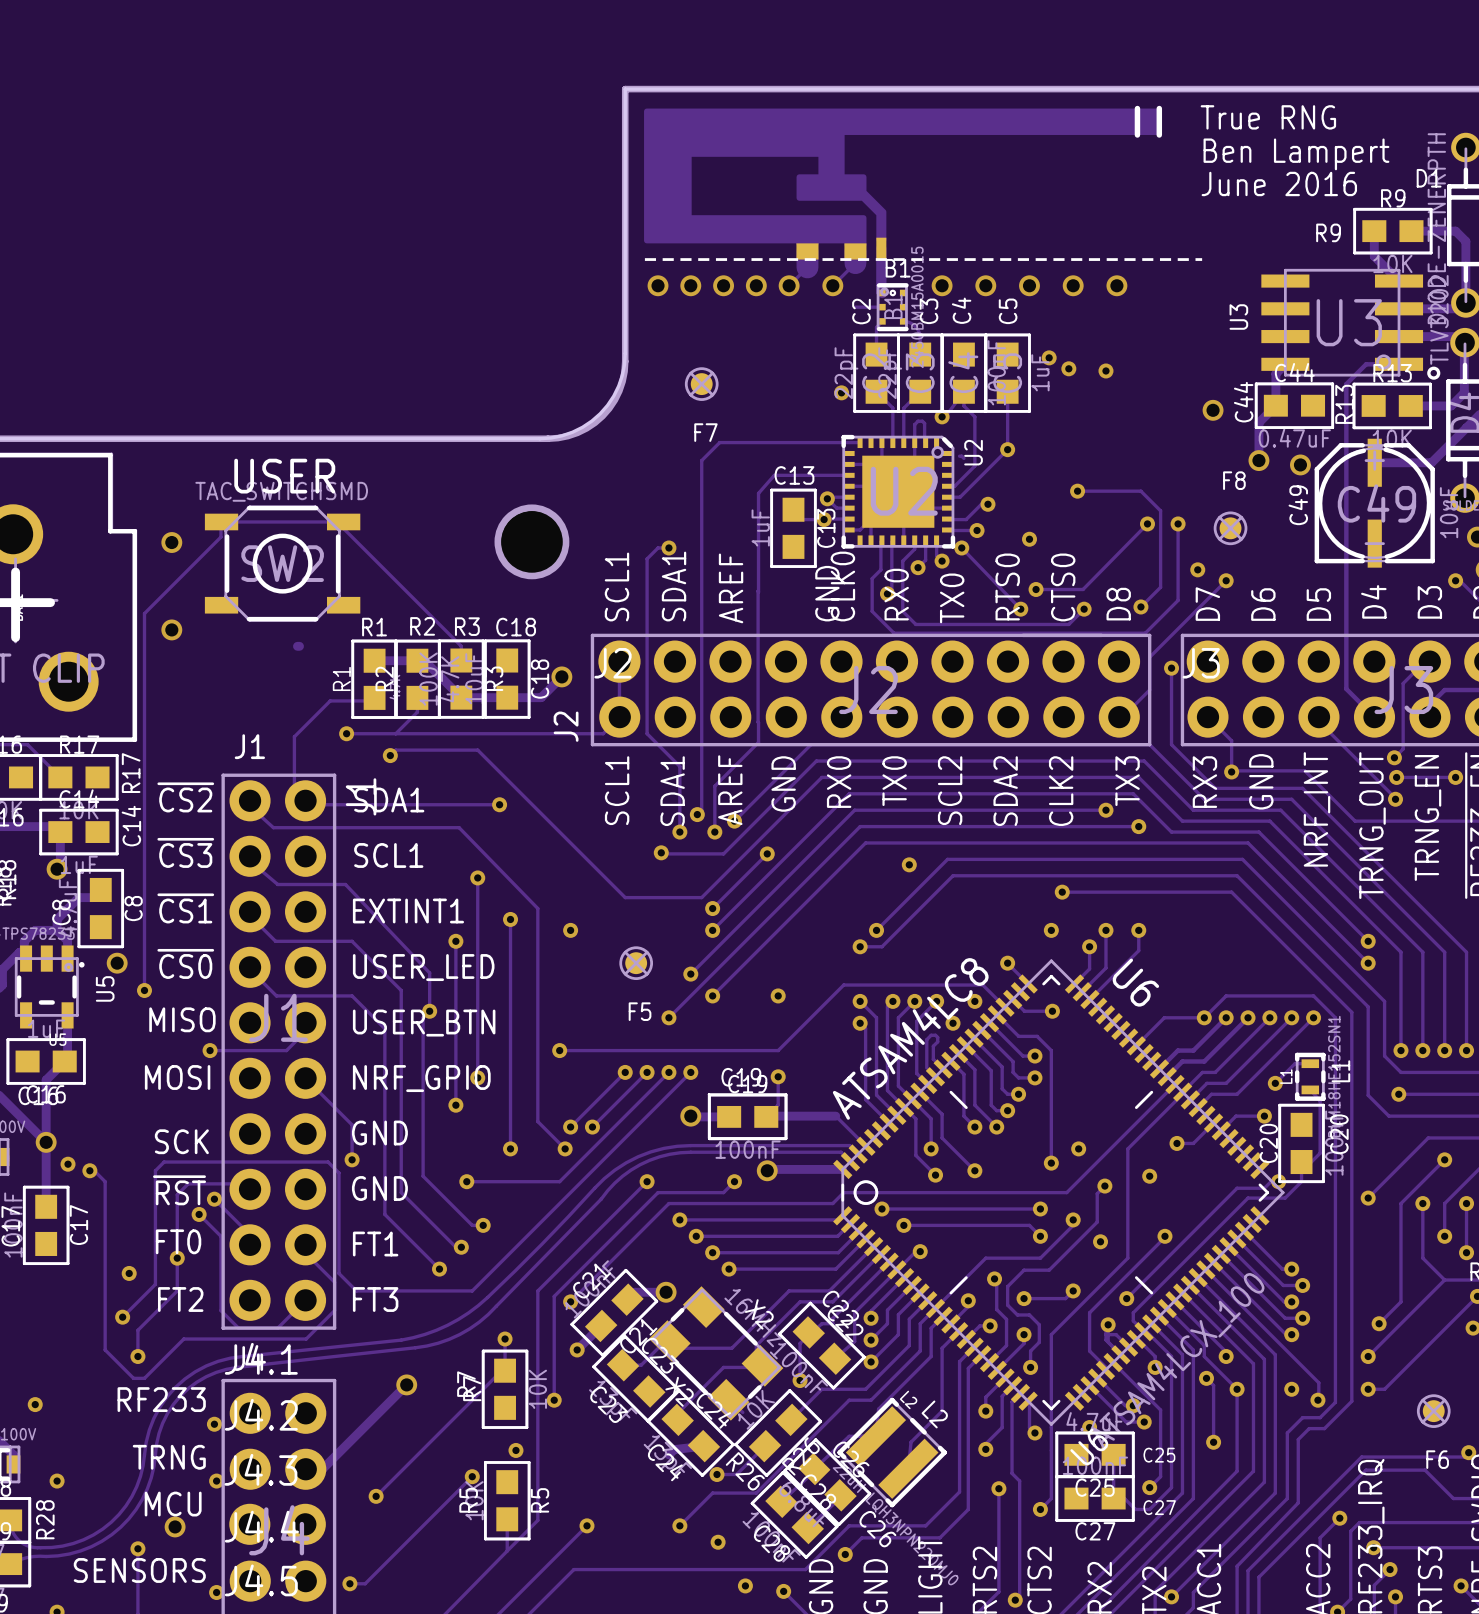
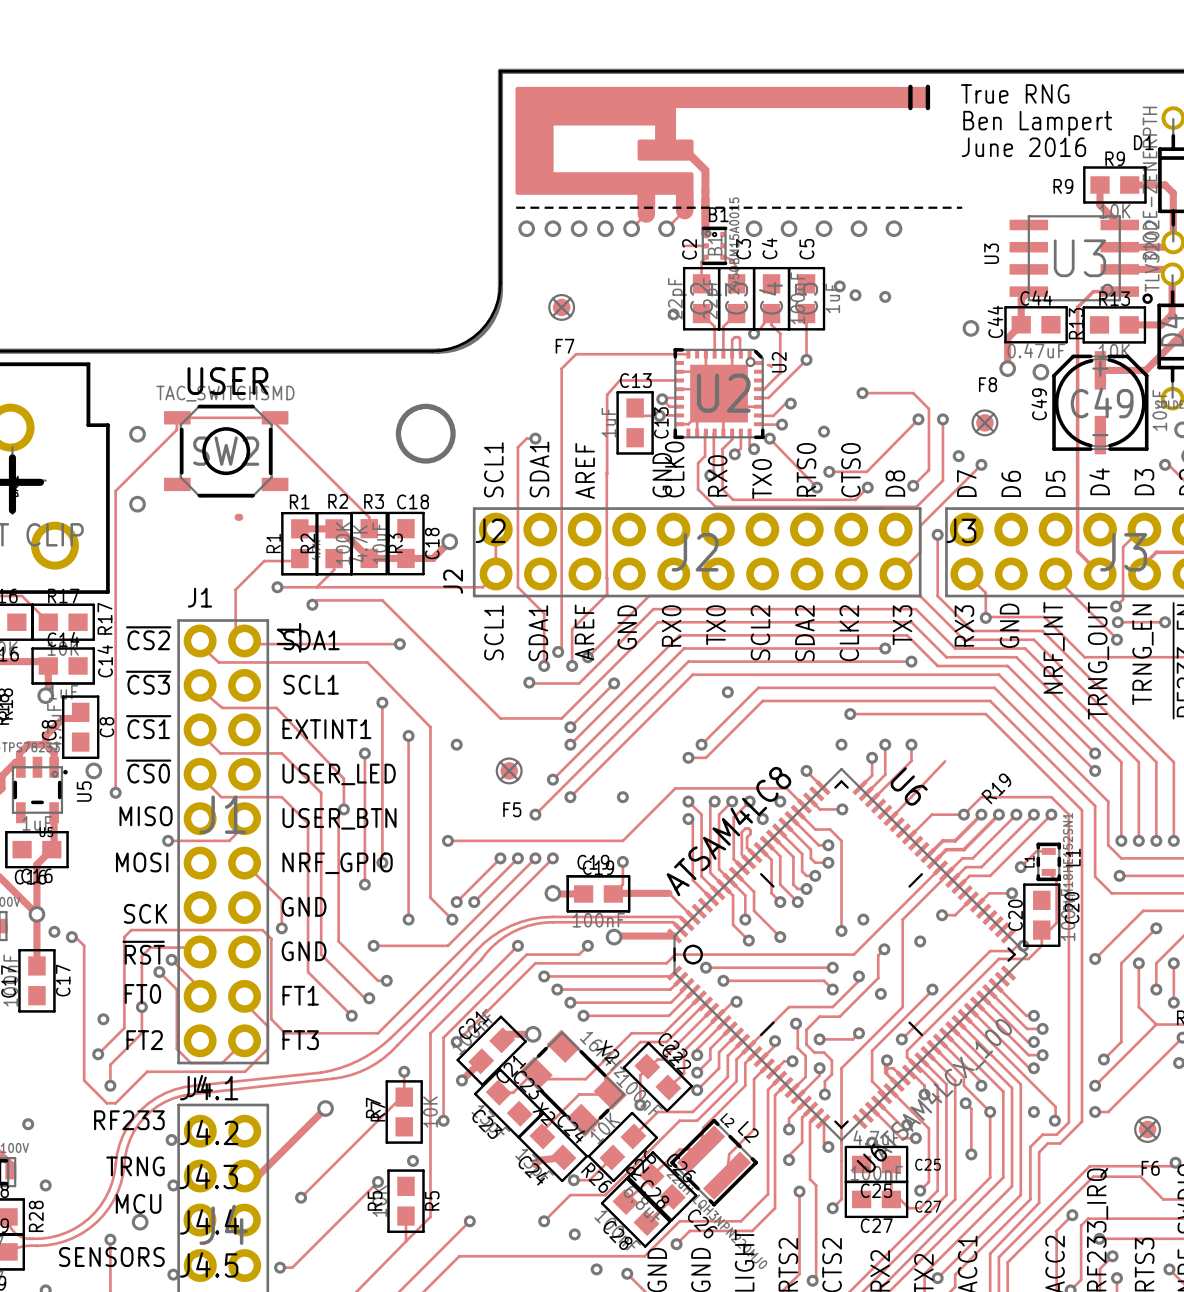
track: none -> (945, 761) (890, 818)
text: none -> R19 (996, 788)

